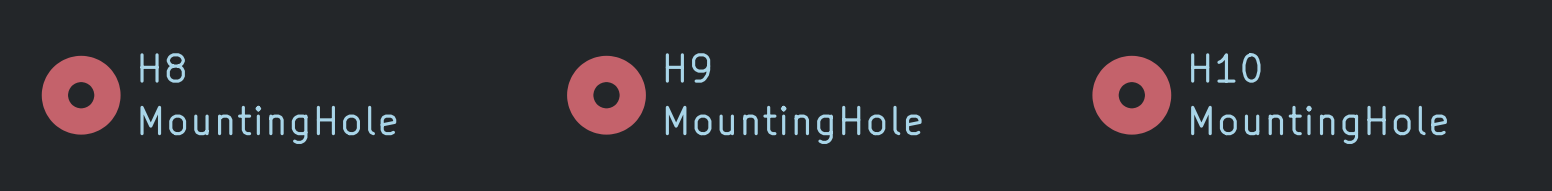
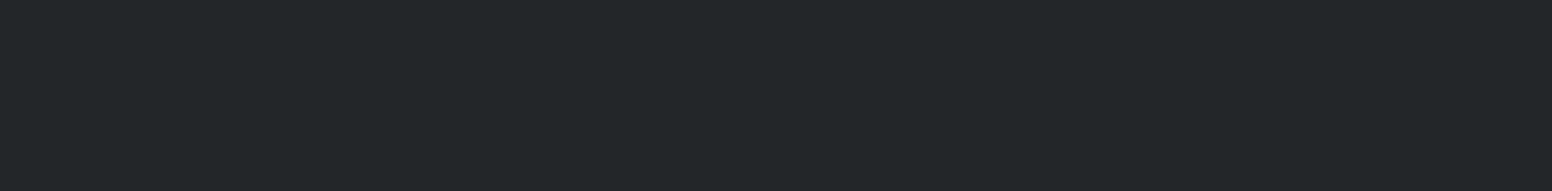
H8: MountingHole (81, 95) -> none
H9: MountingHole (606, 95) -> none
H10: MountingHole (1131, 95) -> none

